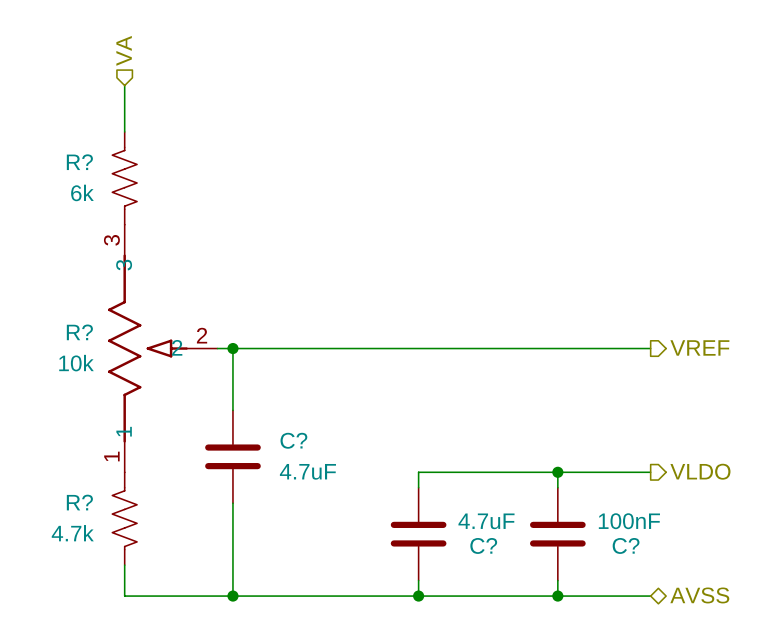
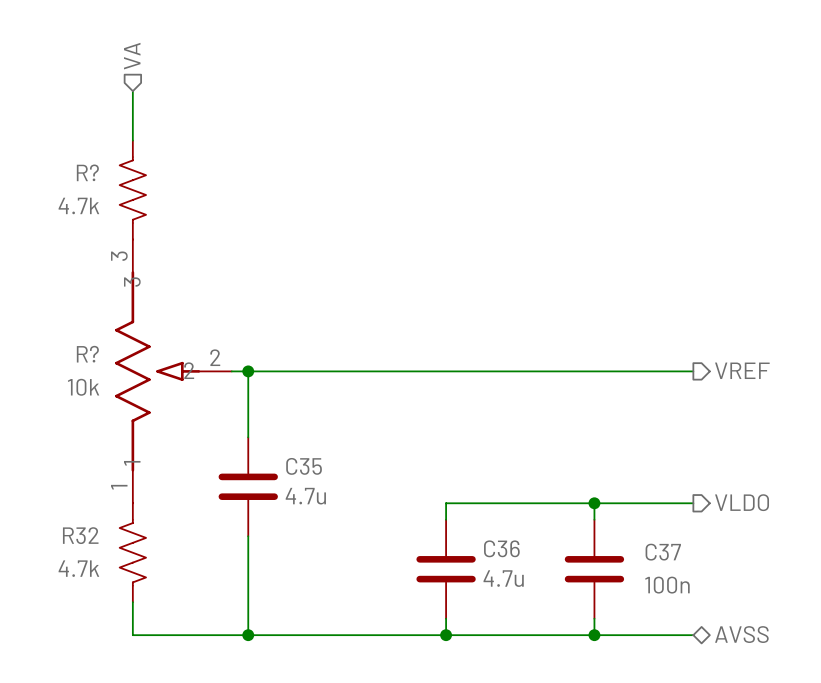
R? value: 6k (82, 192) -> 4.7k (78, 205)
C? name: C? (293, 440) -> C35 (304, 466)
C? value: 4.7uF (307, 471) -> 4.7u (305, 496)
R? name: R? (79, 502) -> R32 (80, 535)
C? value: 4.7uF (486, 521) -> 4.7u (503, 578)
C? value: 100nF (629, 521) -> 100n (667, 585)
C? name: C? (483, 545) -> C36 (501, 548)
C? name: C? (626, 545) -> C37 (663, 552)

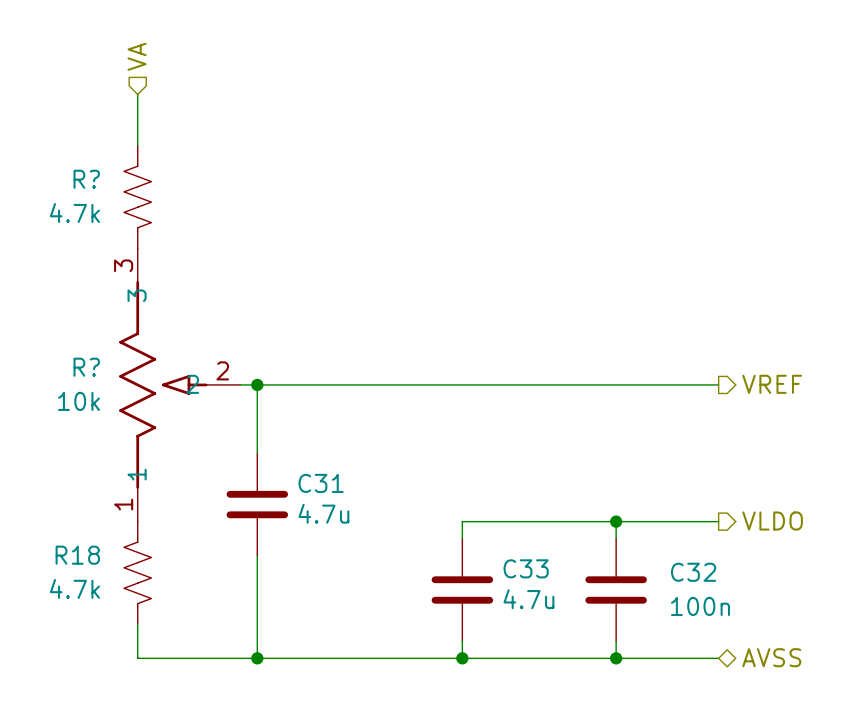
C35 name: C35 (304, 466) -> C31 (321, 483)
R32 name: R32 (80, 535) -> R18 (77, 555)
C36 name: C36 (501, 548) -> C33 (526, 568)
C37 name: C37 (663, 552) -> C32 (693, 572)

